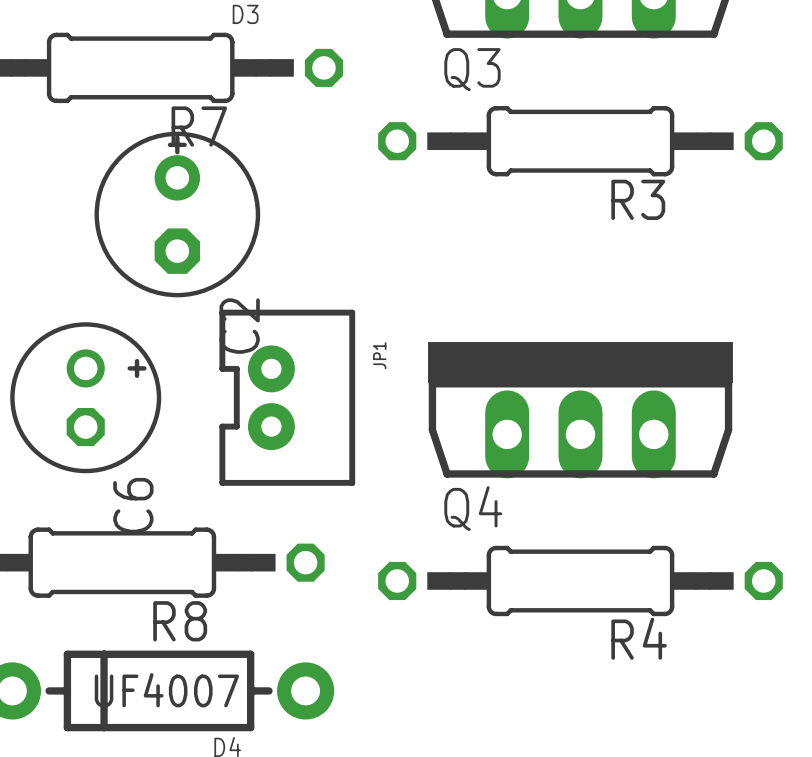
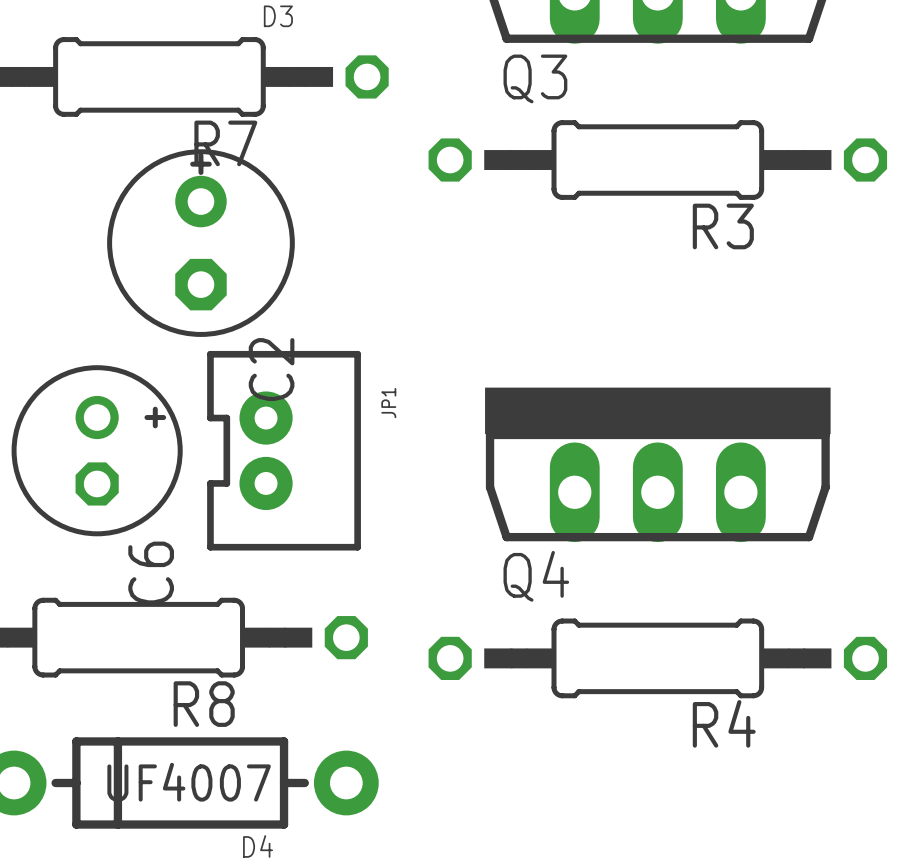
JP1 position: (287, 397) -> (284, 450)

